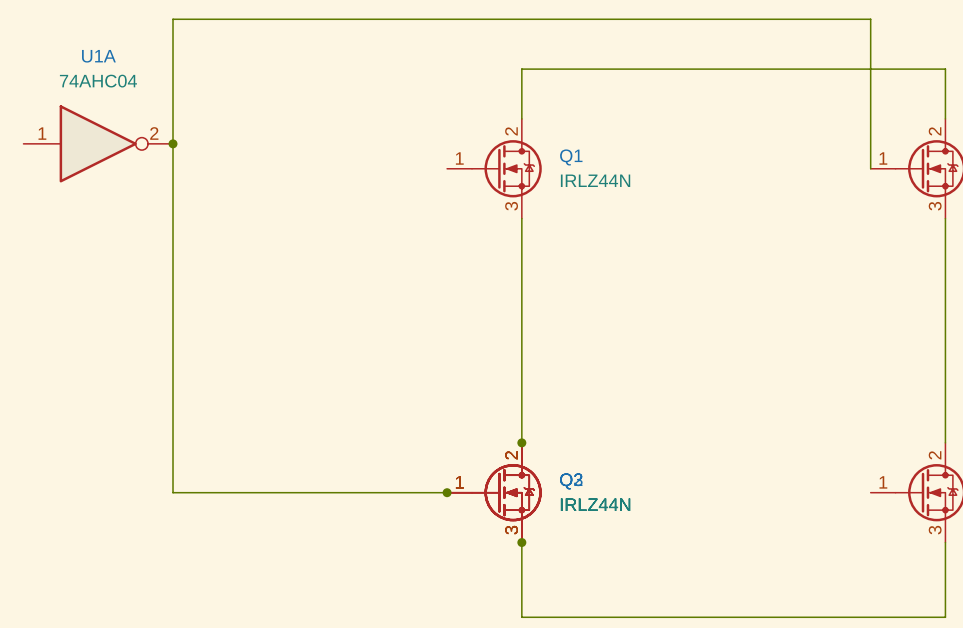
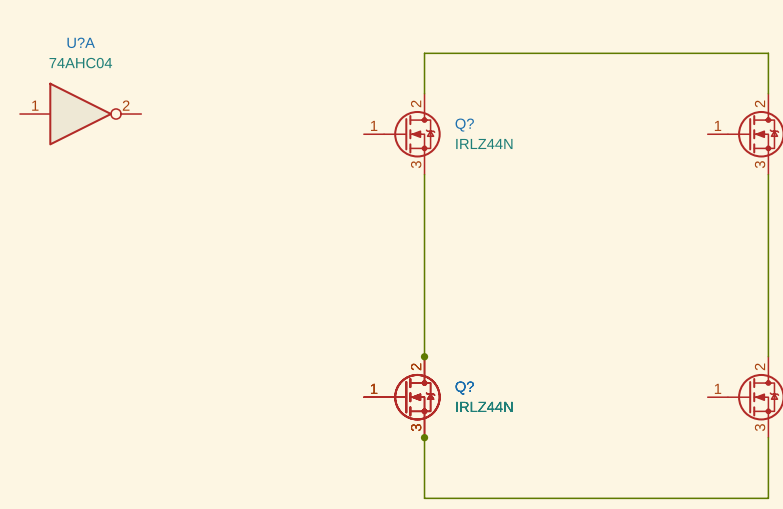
U1A name: U1A (98, 56) -> U?A (81, 42)
junction: (173, 143) -> none
Q1 name: Q1 (571, 157) -> Q? (464, 125)
wire: (870, 168) (870, 19) (173, 19) (173, 492) (447, 492) -> none
junction: (447, 492) -> none
part: IRLZ44N (494, 492) -> none
part: IRLZ44N (494, 492) -> none
Q?: none -> IRLZ44N (402, 397)

